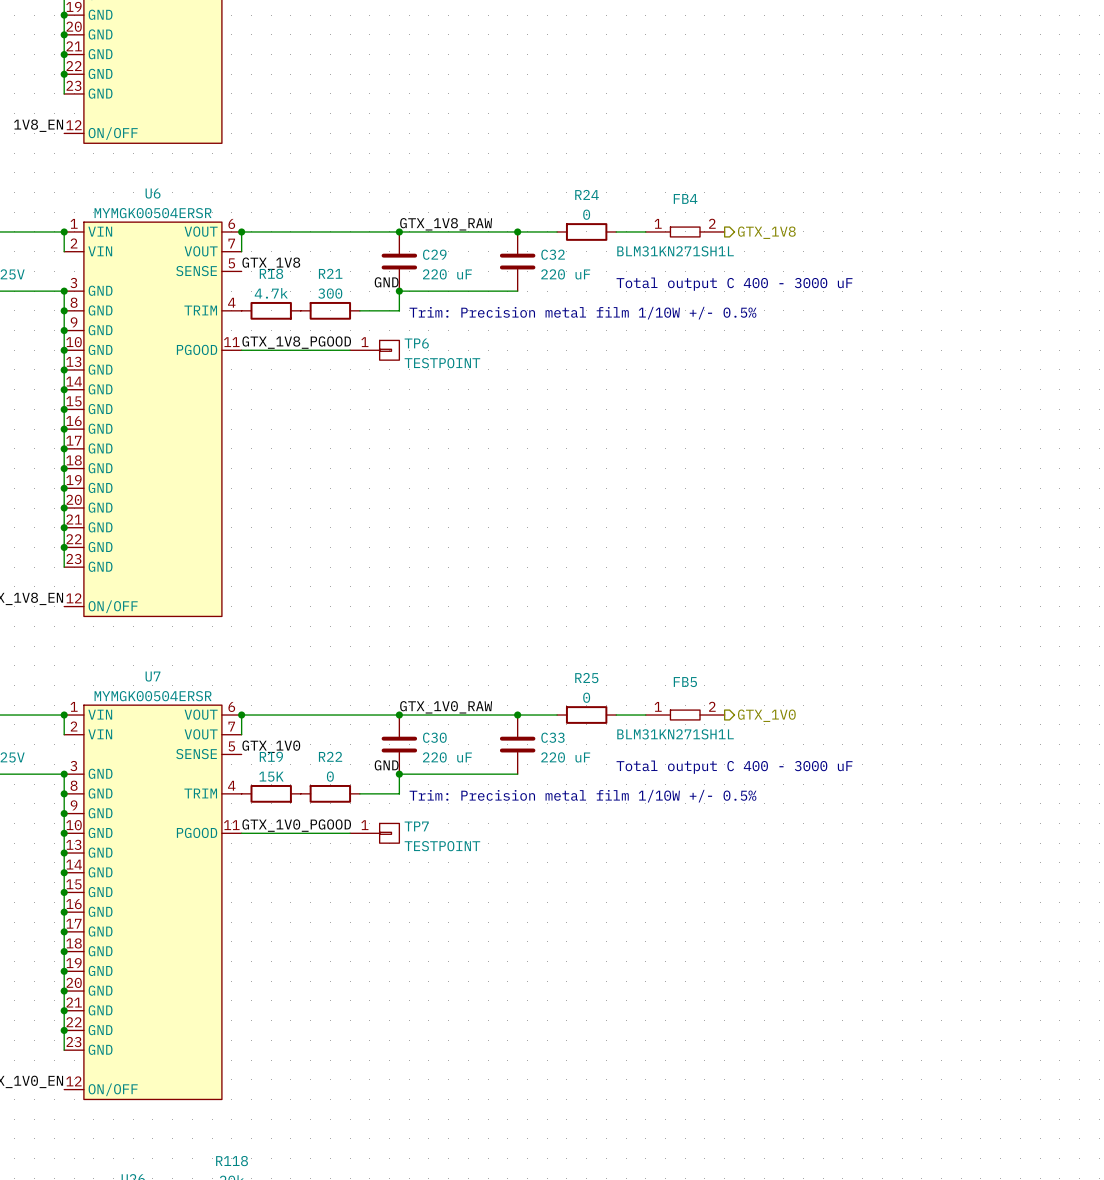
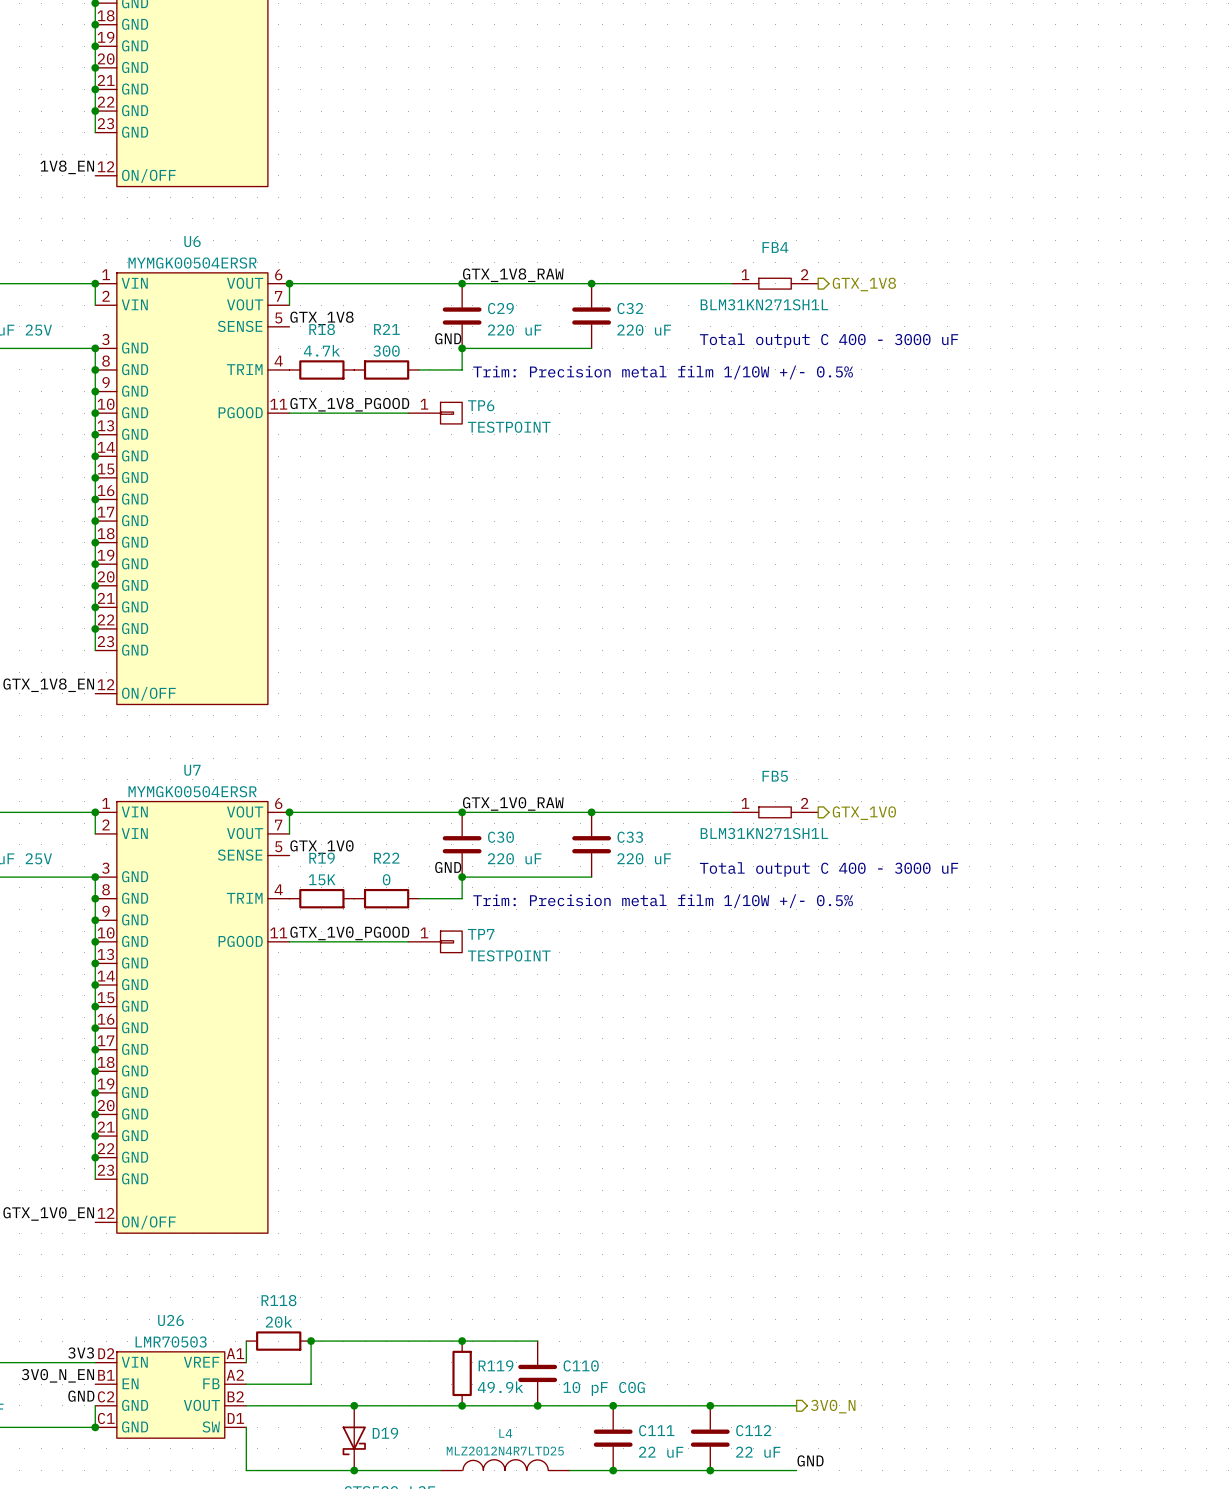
wire: none -> (634, 283) (699, 283)
R24: 0 (586, 231) -> none
wire: none -> (634, 812) (699, 812)
R25: 0 (586, 715) -> none

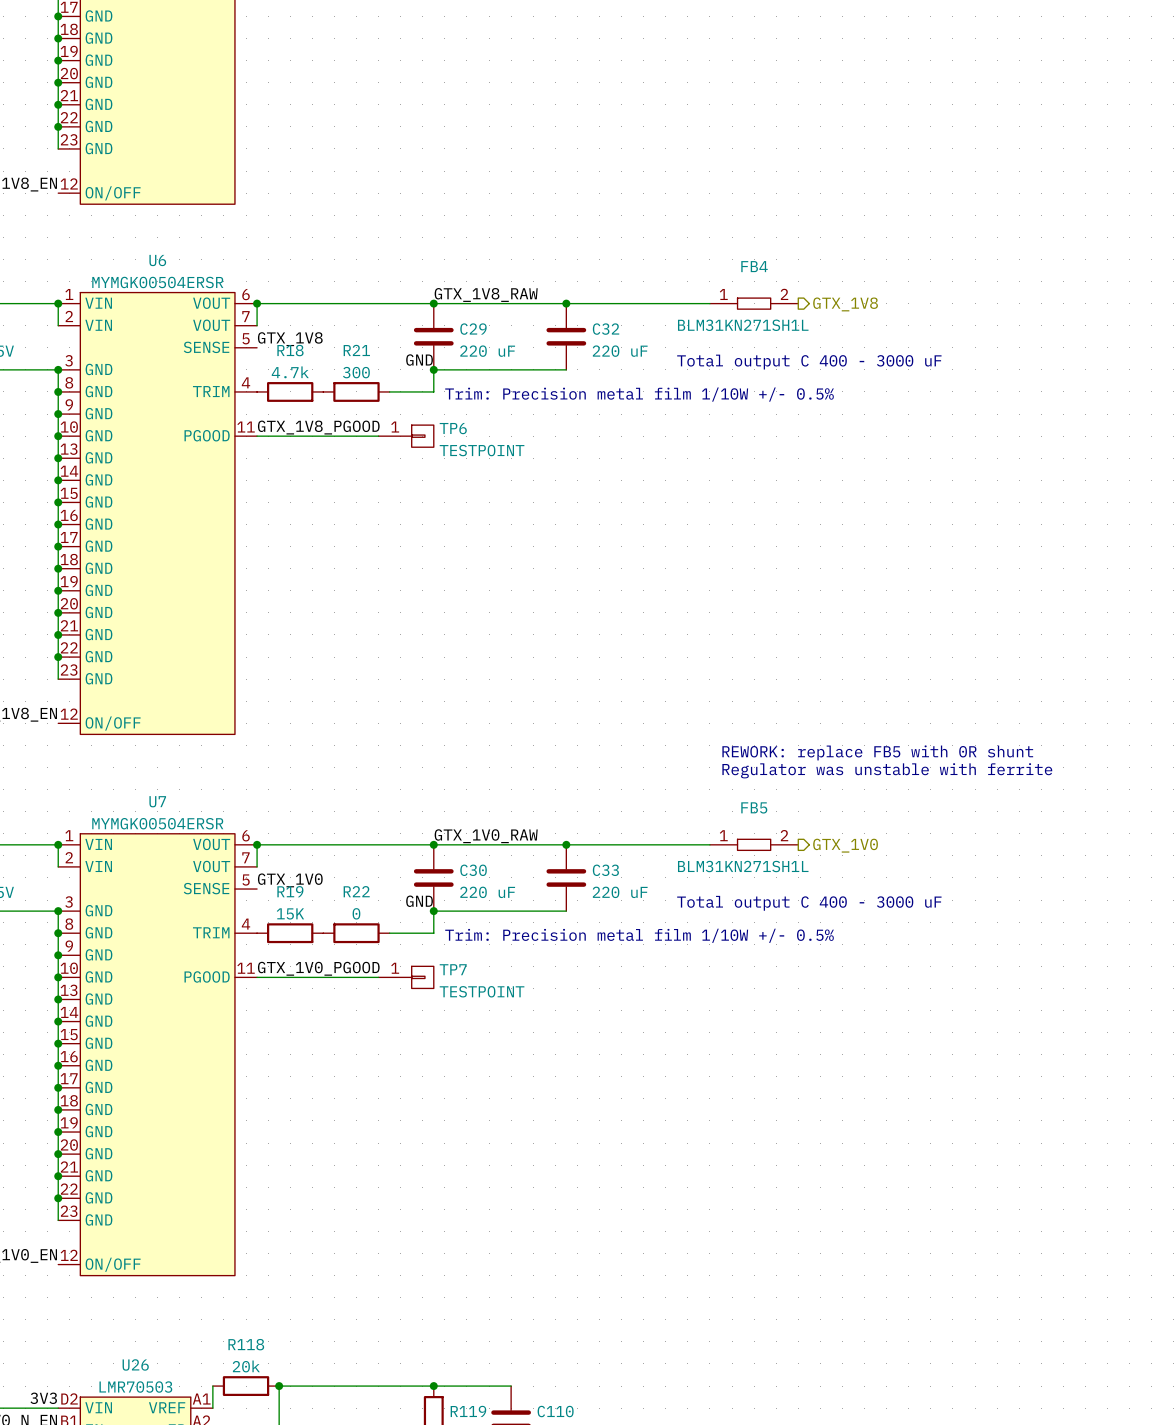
text: none -> REWORK: replace FB5 with 0R shunt (877, 752)
text: none -> Regulator was unstable with ferrite (887, 770)

